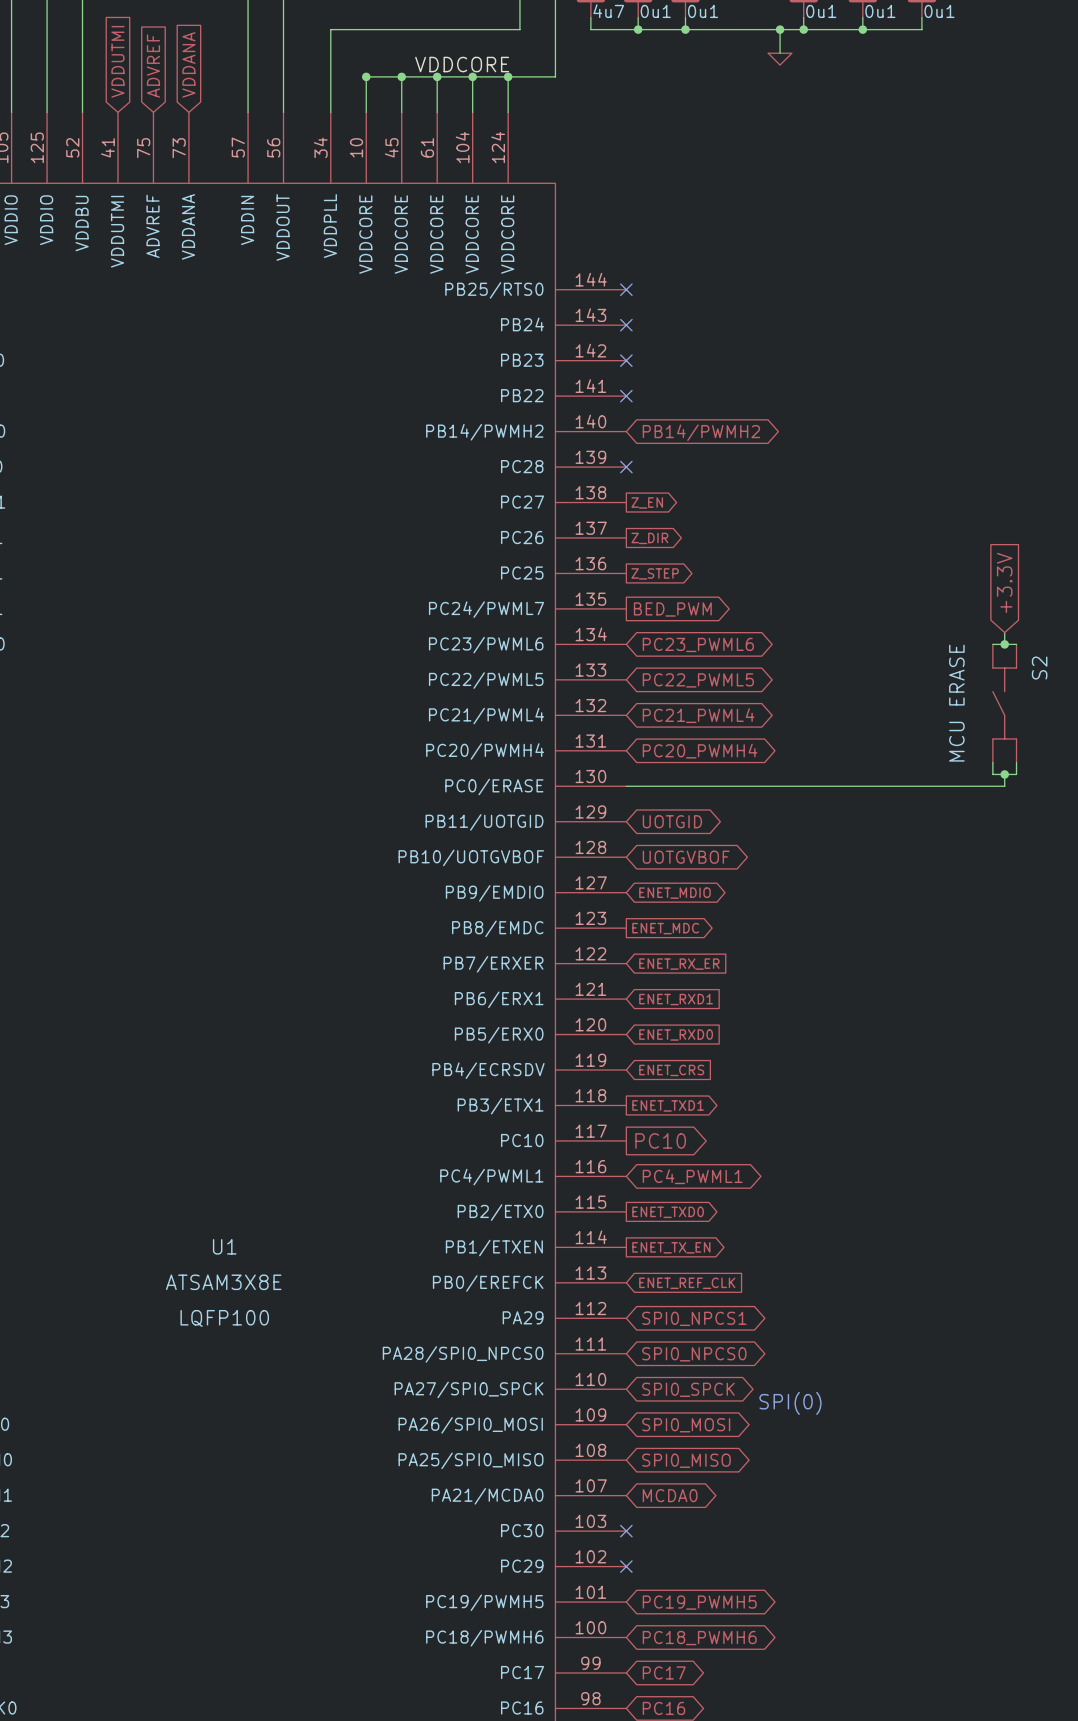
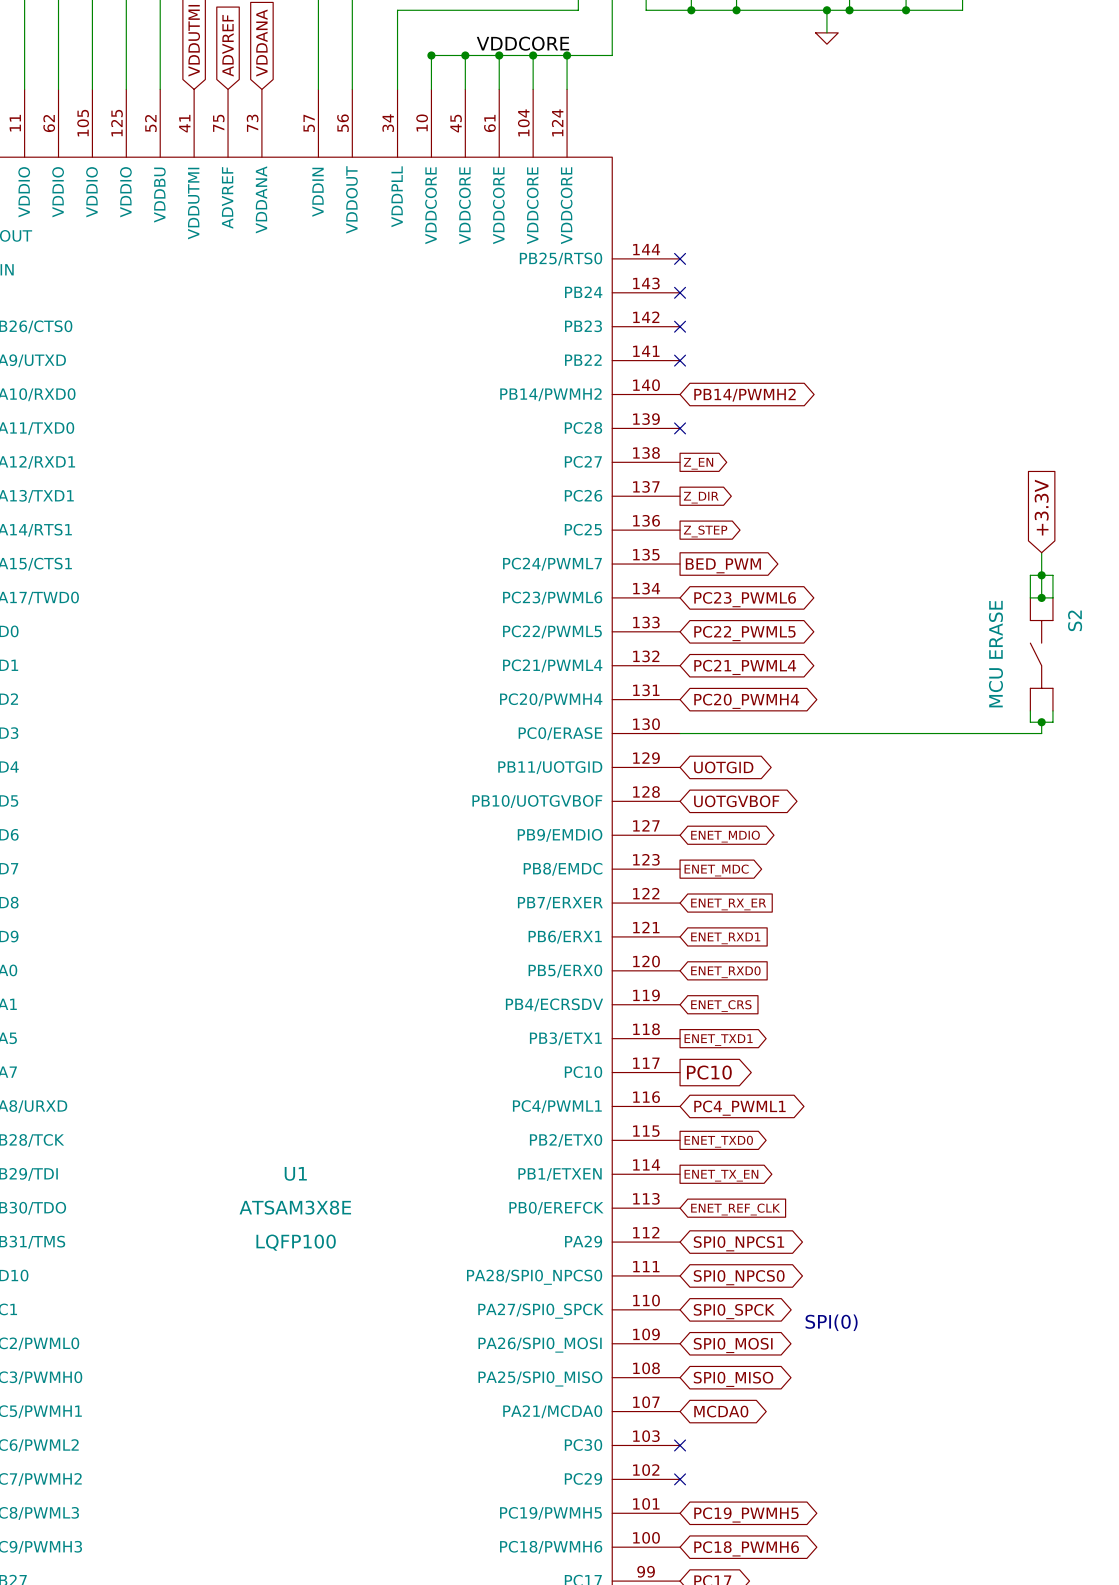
global label position: +3.3V (1004, 582) -> +3.3V (1041, 507)
wire: none -> (1041, 552) (1041, 586)
junction: none -> (1041, 575)
wire: none -> (1030, 597) (1030, 575) (1052, 575) (1052, 597)

